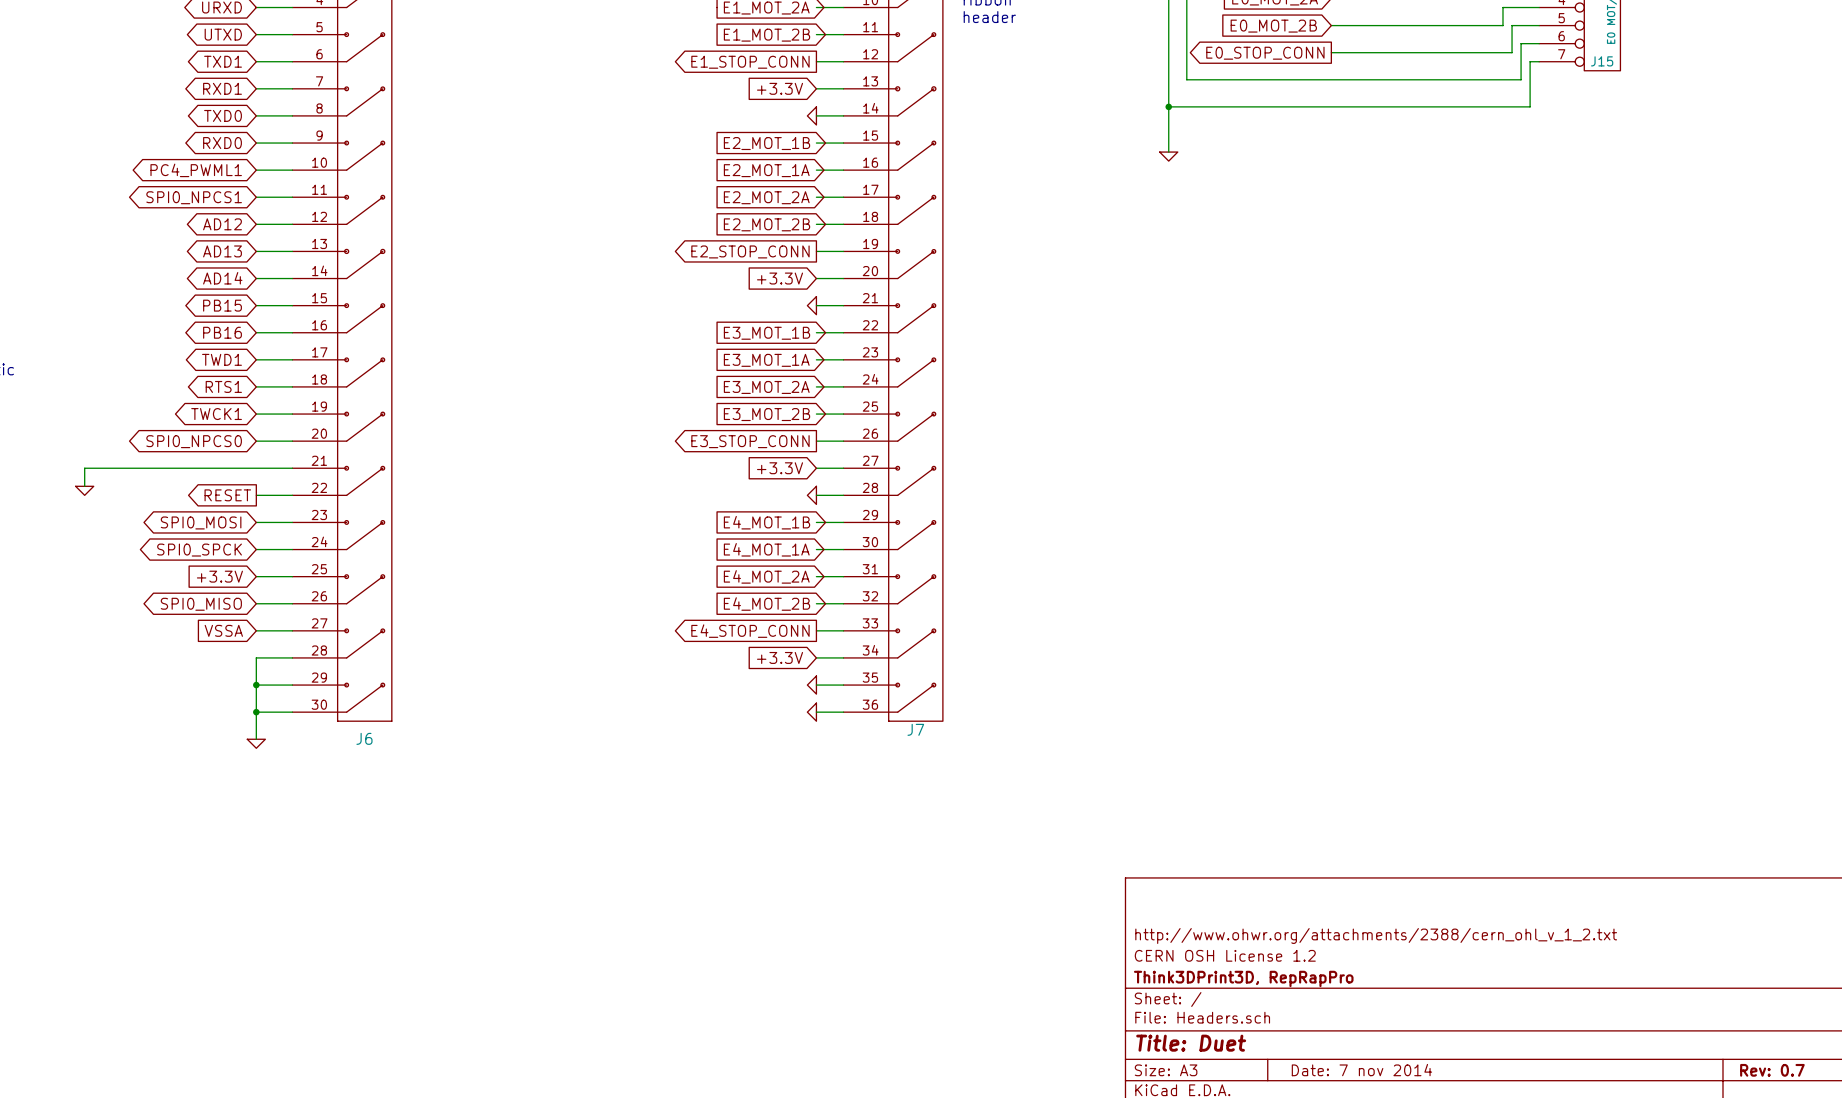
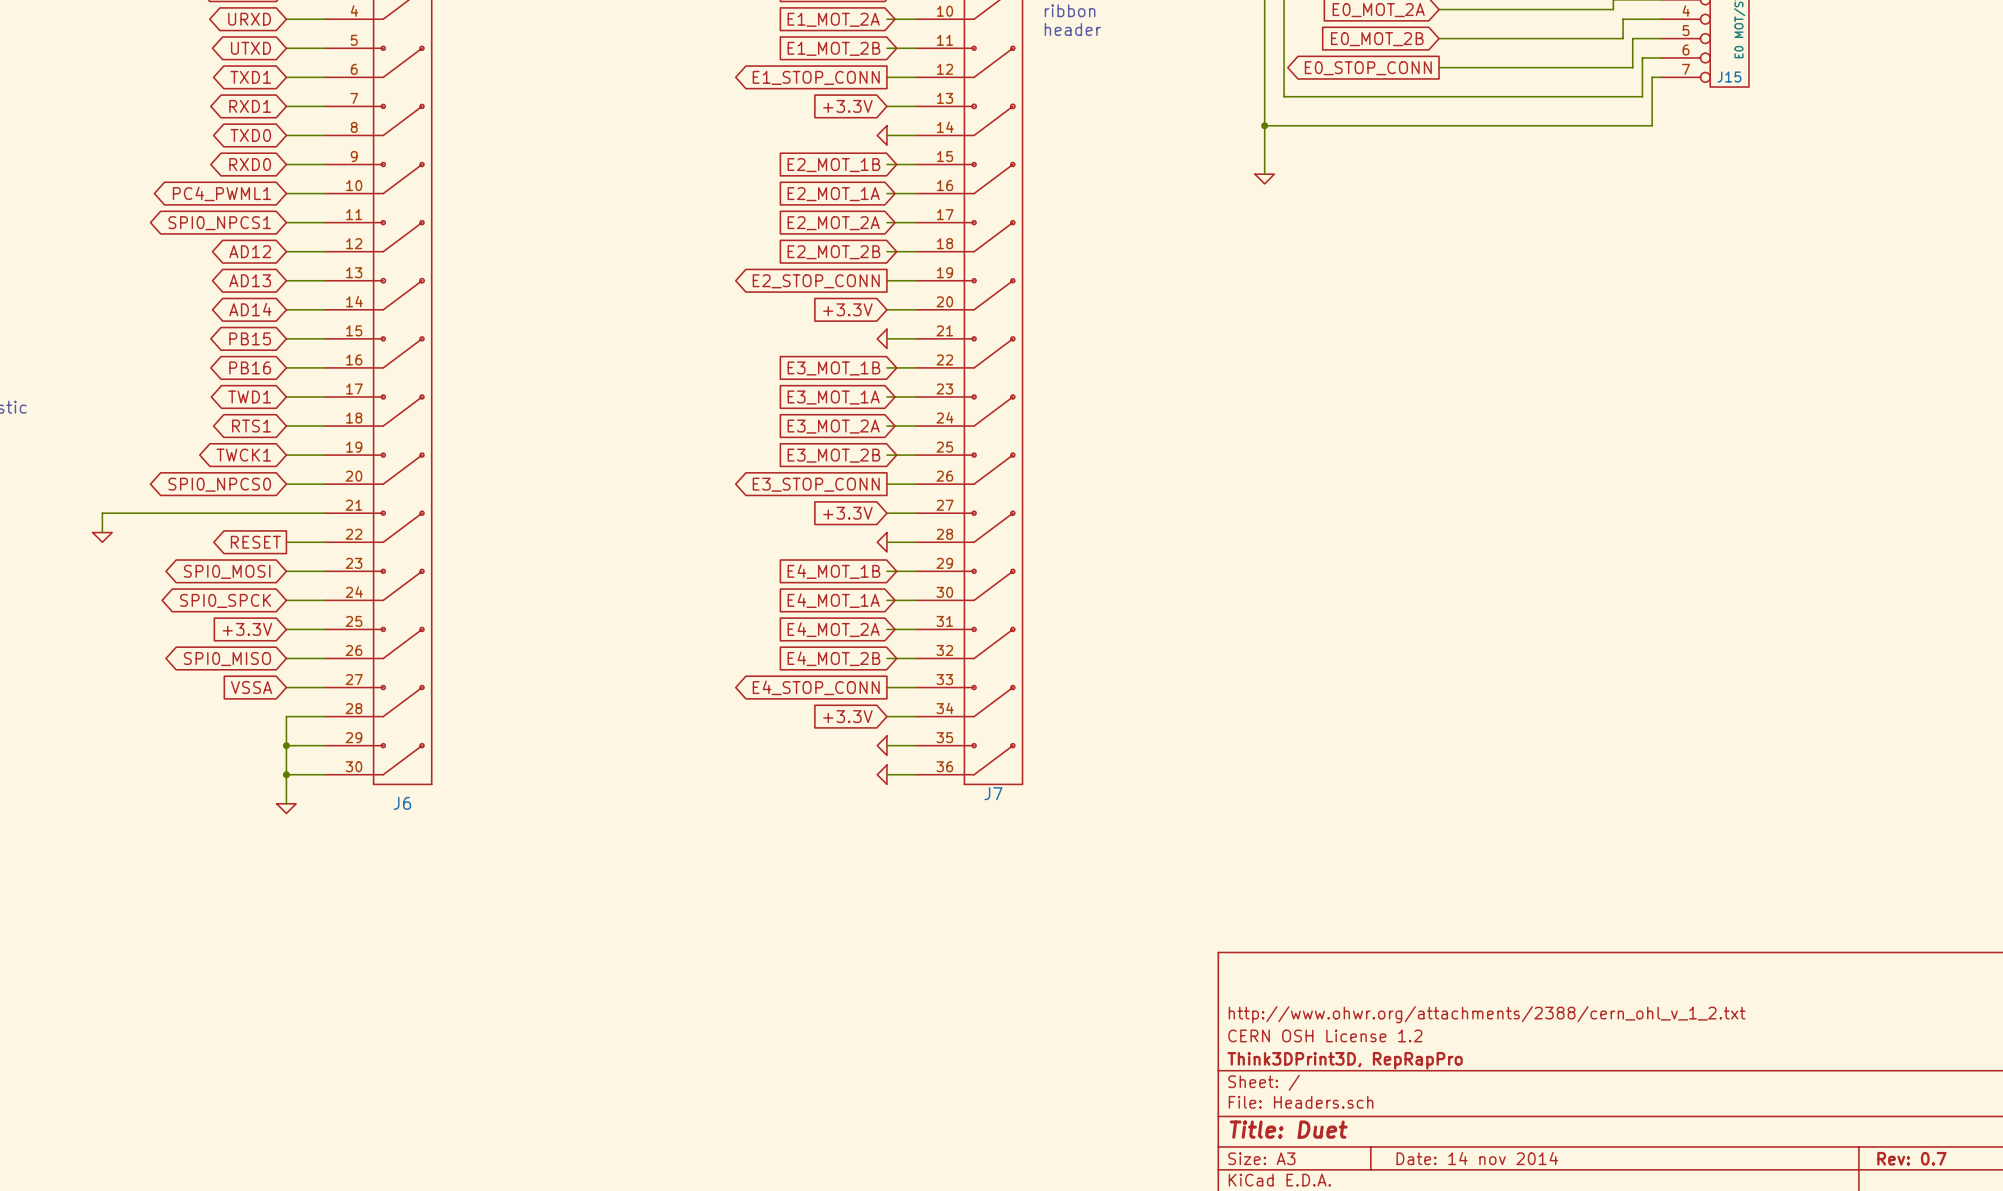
title block: Date: 7 nov 2014 (1361, 1070) -> Date: 14 nov 2014 (1477, 1158)

